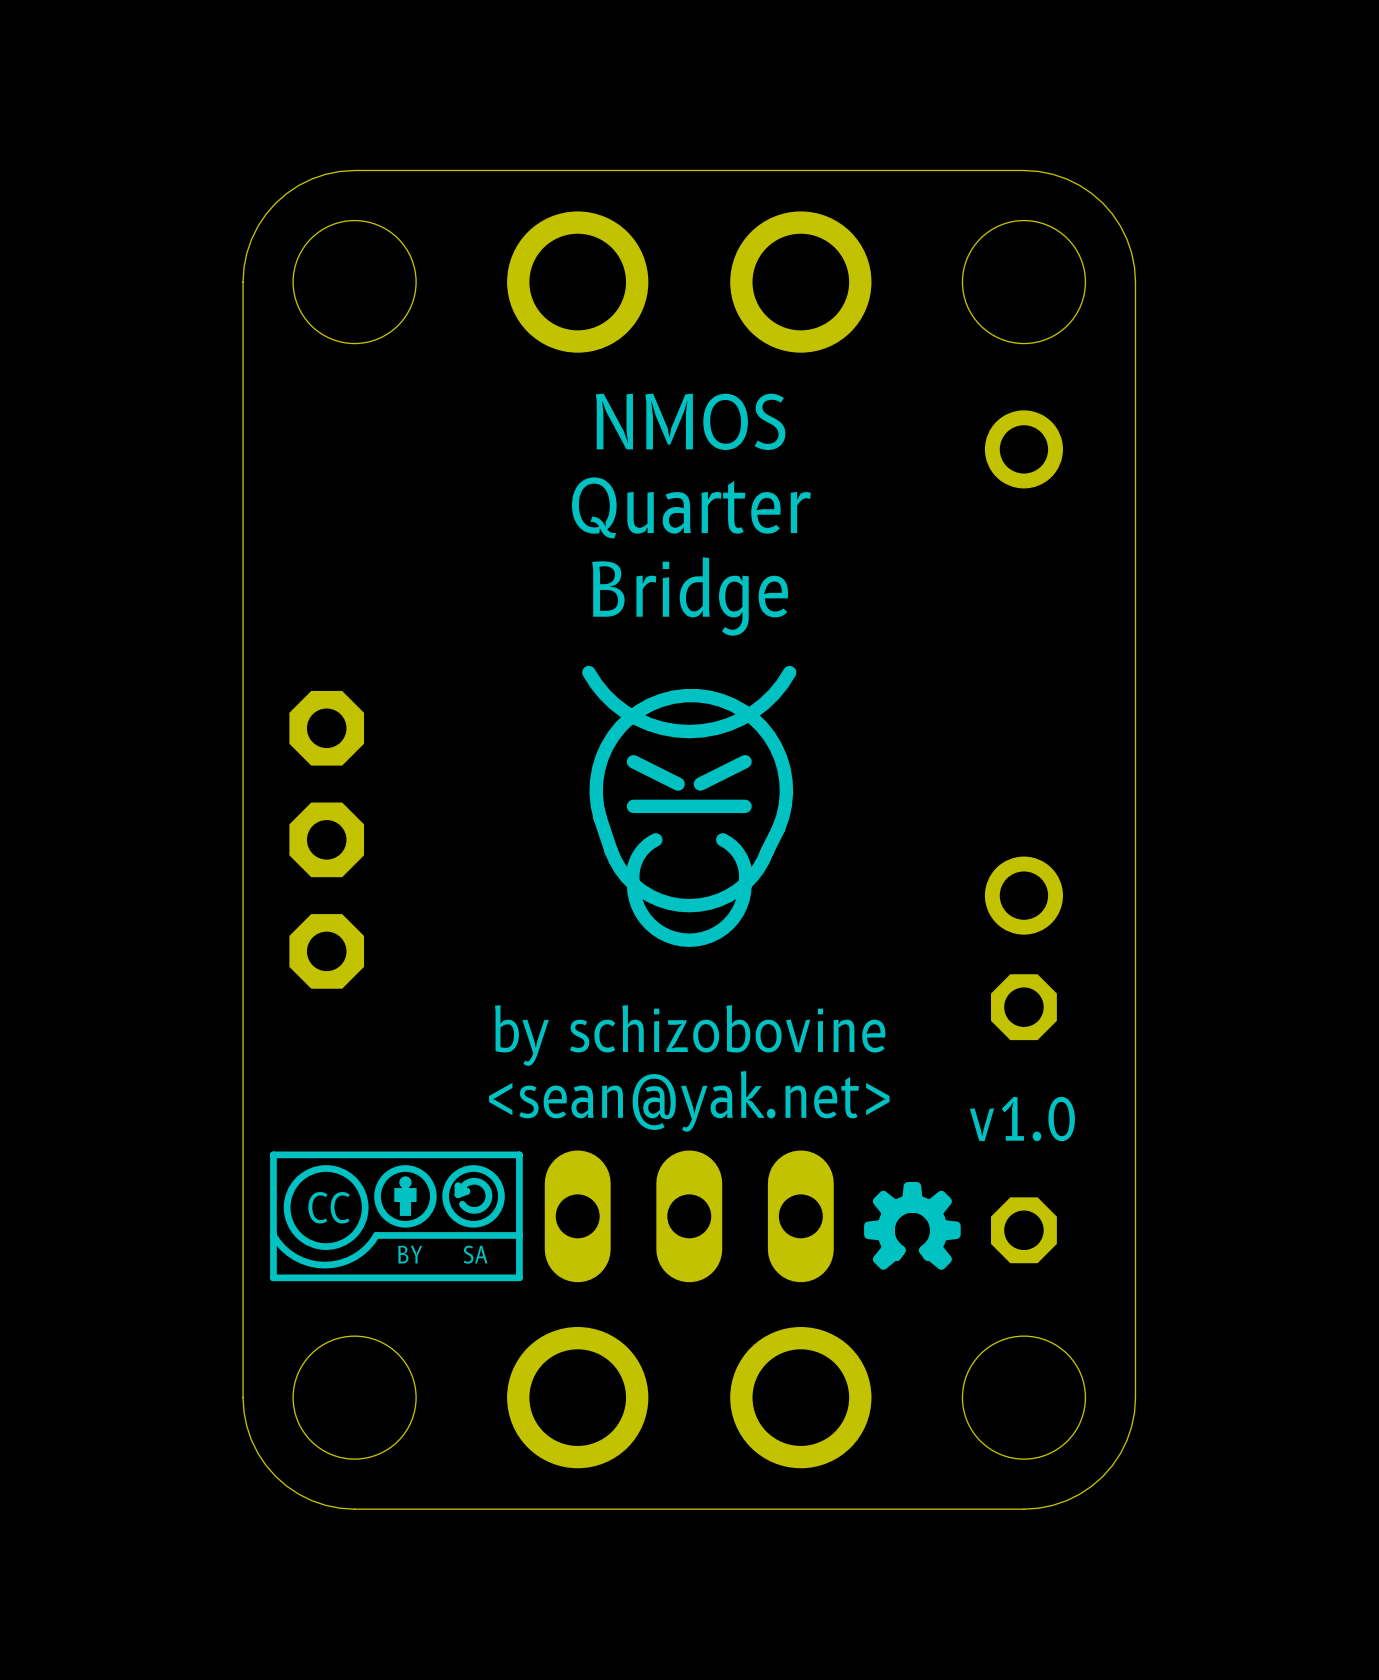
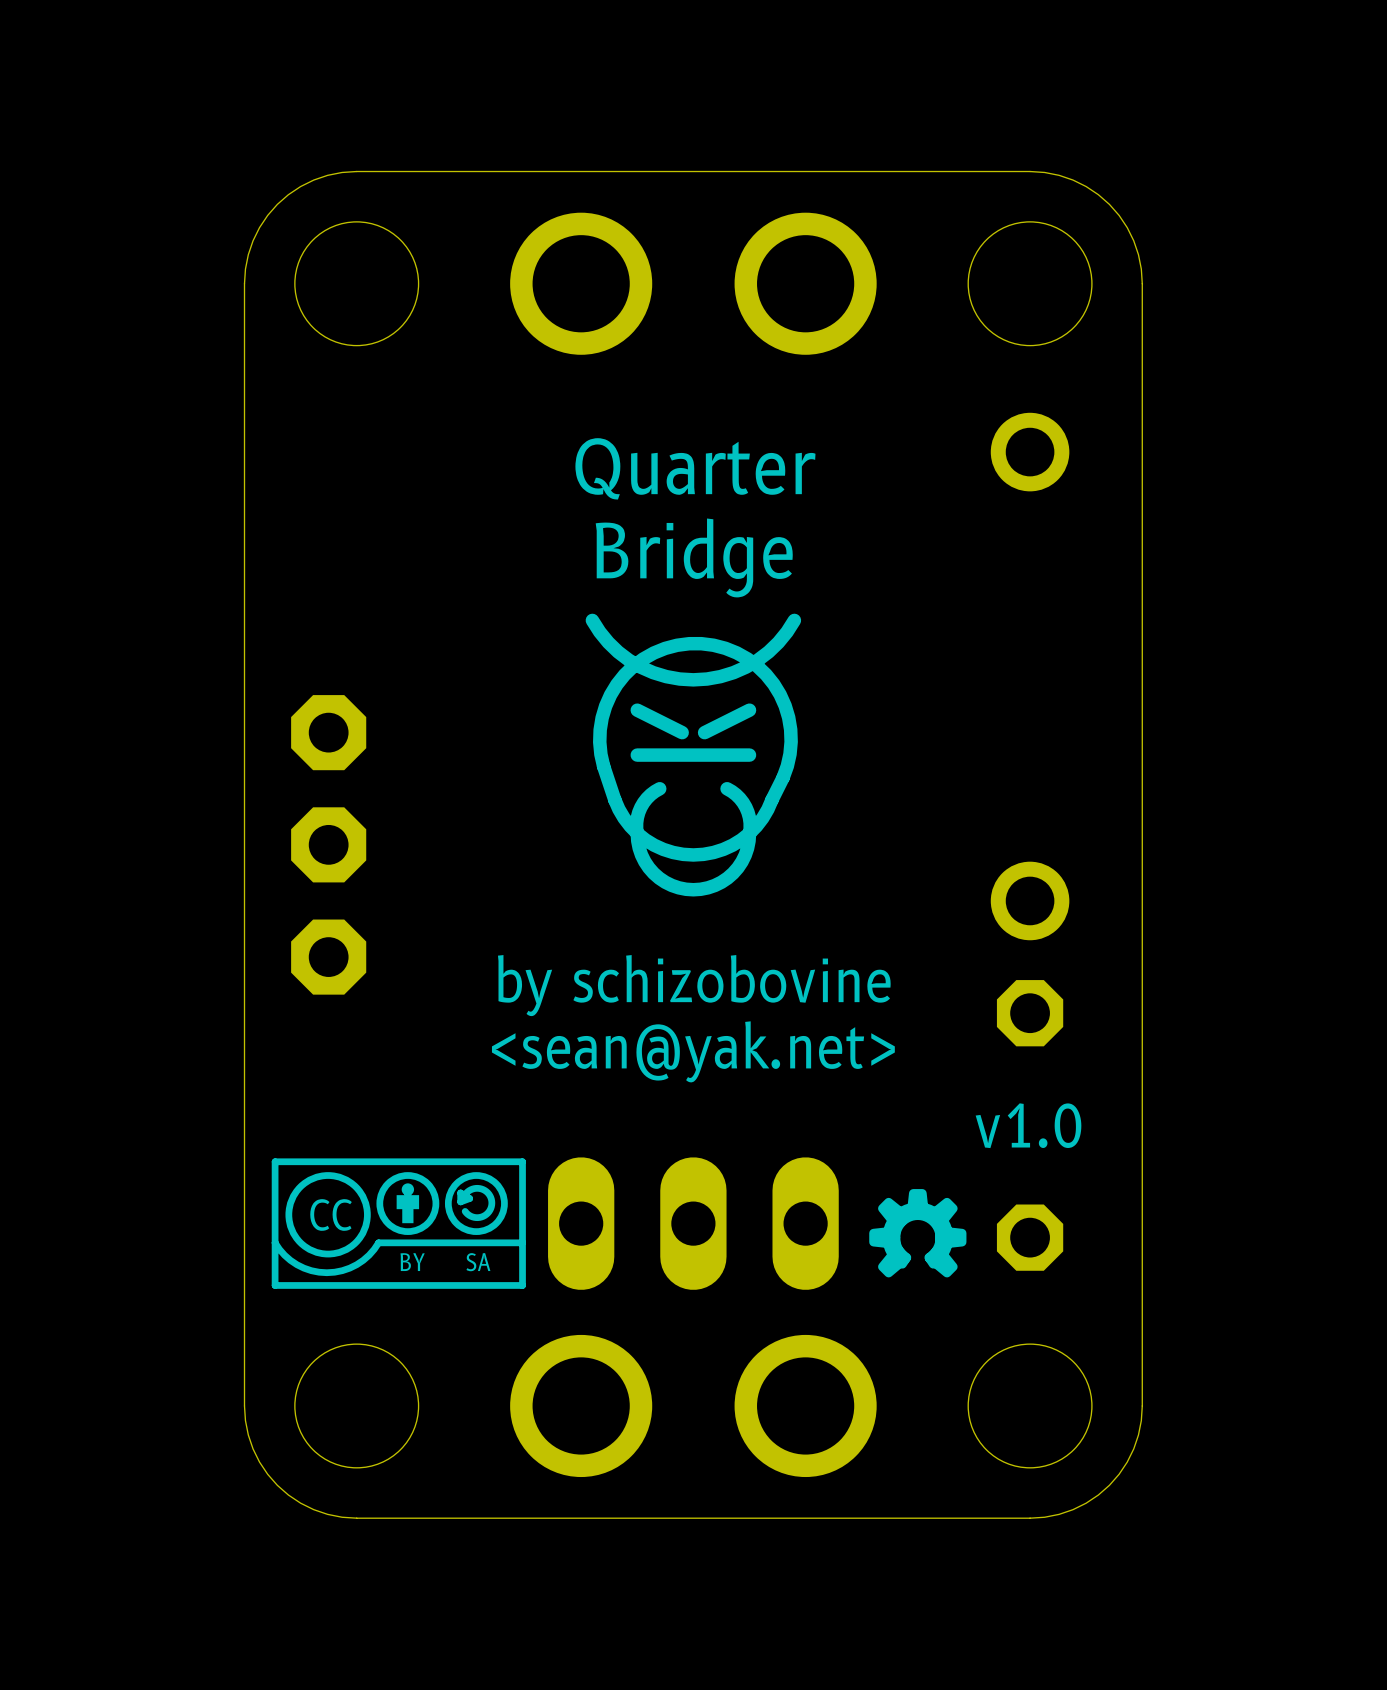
text: NMOS (690, 421) -> none
text position: Quarter (691, 507) -> Quarter (695, 468)
text position: Bridge (690, 596) -> Bridge (694, 557)
drawing position: (689, 806) -> (693, 755)
text: none -> by schizobovine (694, 985)
text: by schizobovine (690, 1035) -> <sean@yak.net> (693, 1051)
text: <sean@yak.net> (689, 1101) -> none

